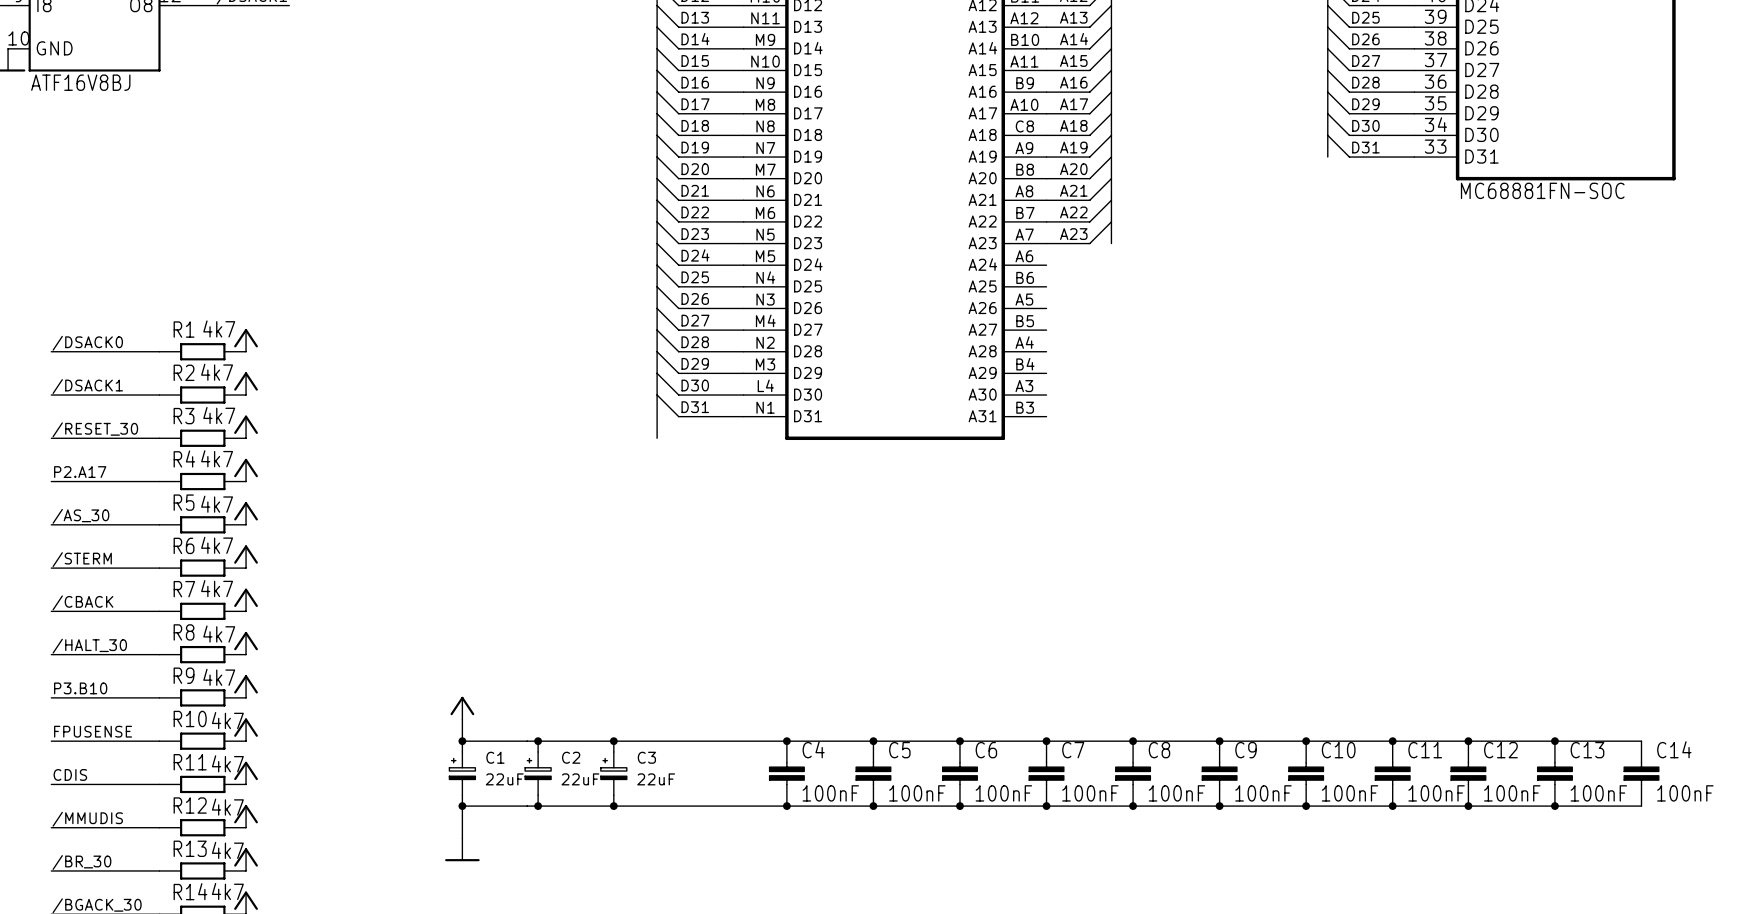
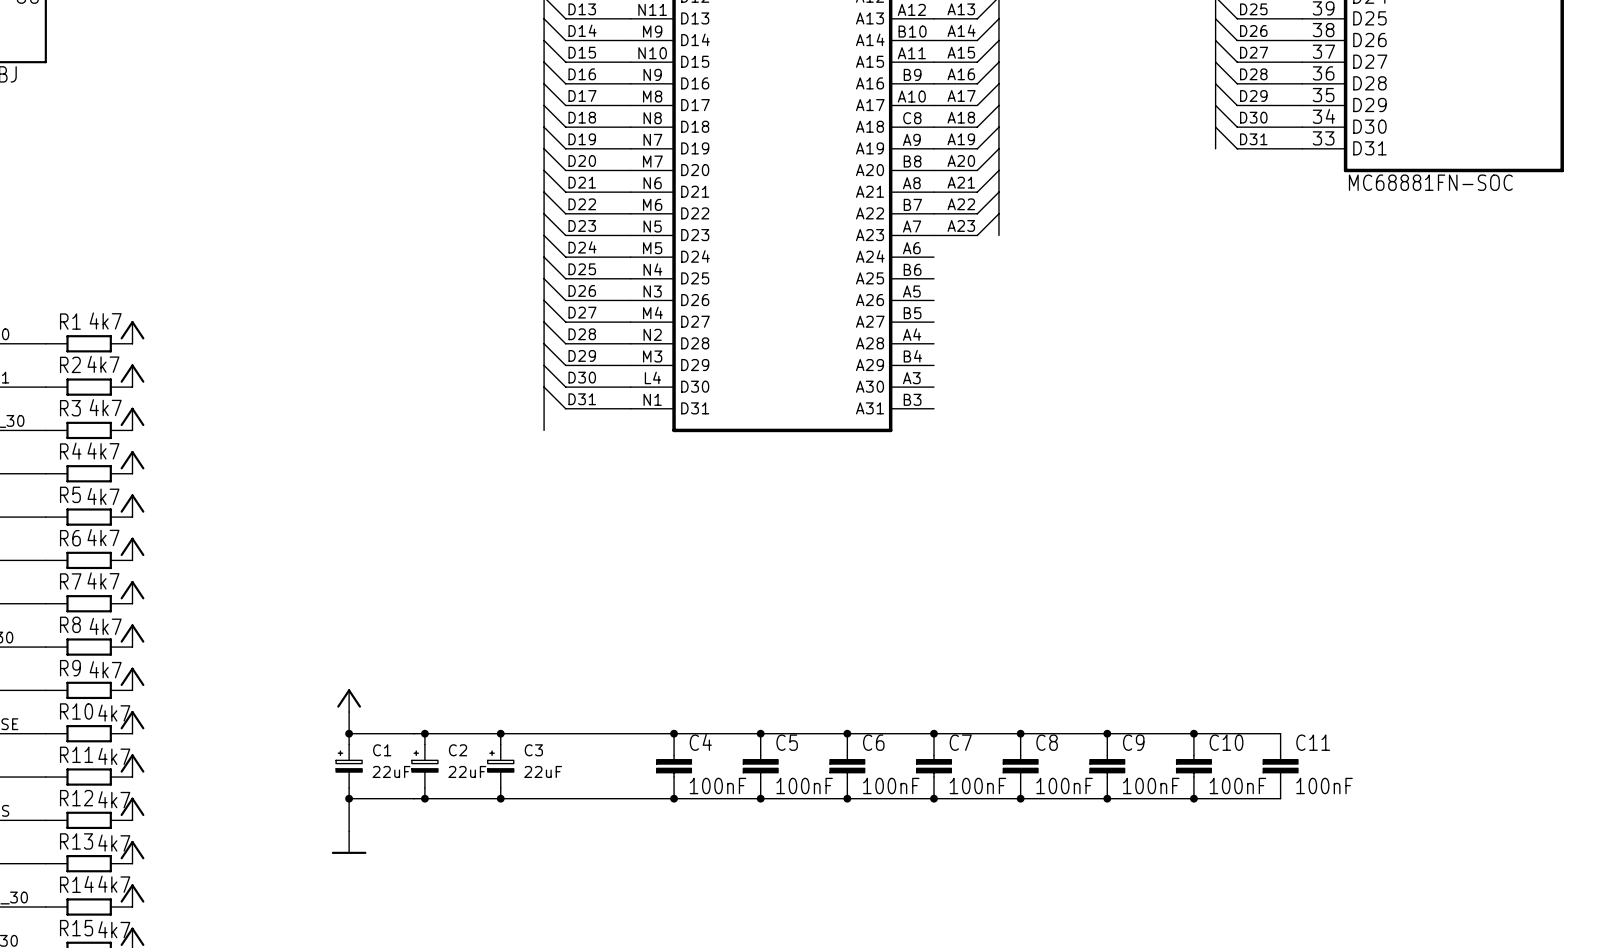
wire: (1392, 741) (1641, 741) -> none
junction: (1392, 741) -> none
junction: (1468, 741) -> none
junction: (1554, 741) -> none
C12: 100nF (1468, 773) -> none
C13: 100nF (1554, 773) -> none
C14: 100nF (1641, 773) -> none
wire: (1392, 806) (1641, 806) -> none
junction: (1392, 806) -> none
junction: (1468, 806) -> none
junction: (1554, 806) -> none

